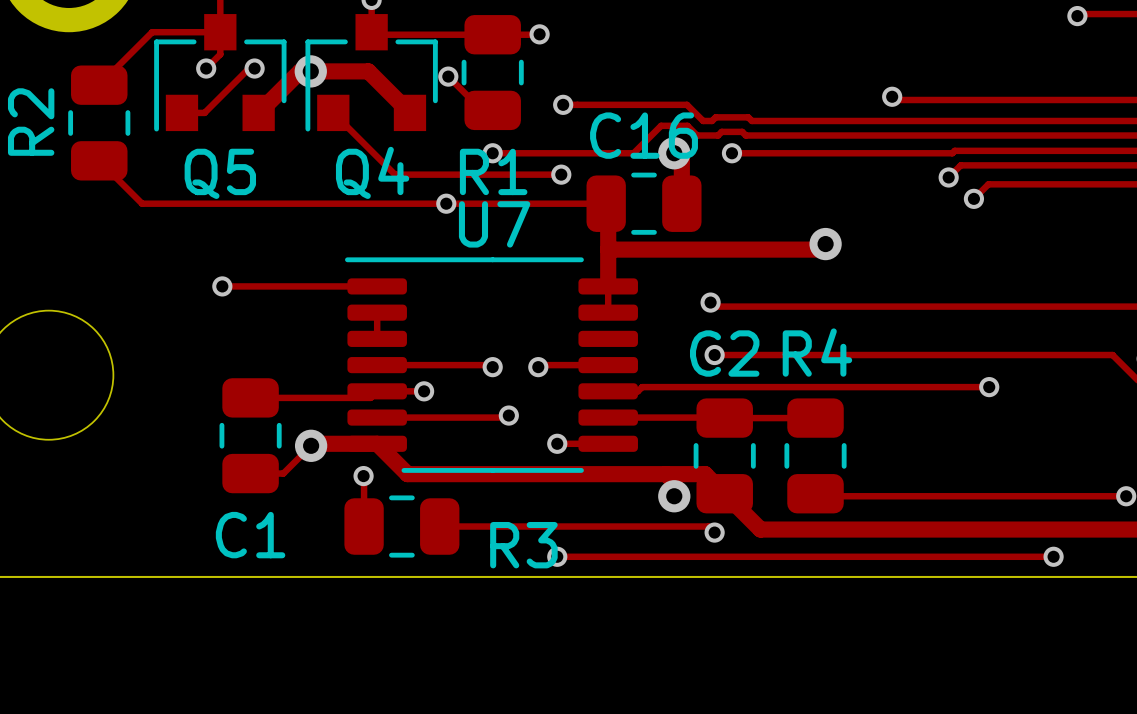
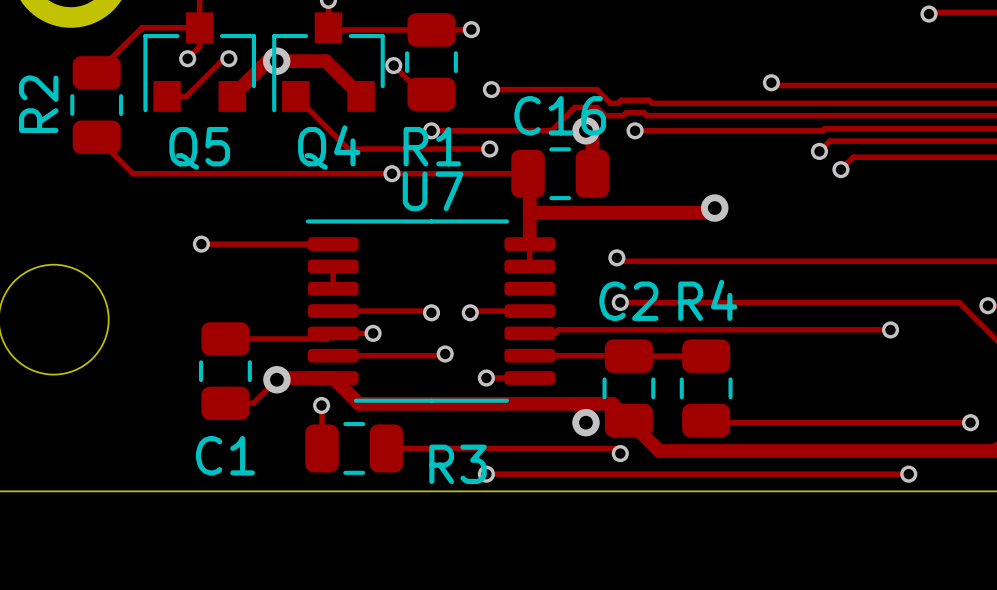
track: none -> (853, 329) (890, 329)
via position: (989, 387) -> (890, 329)

